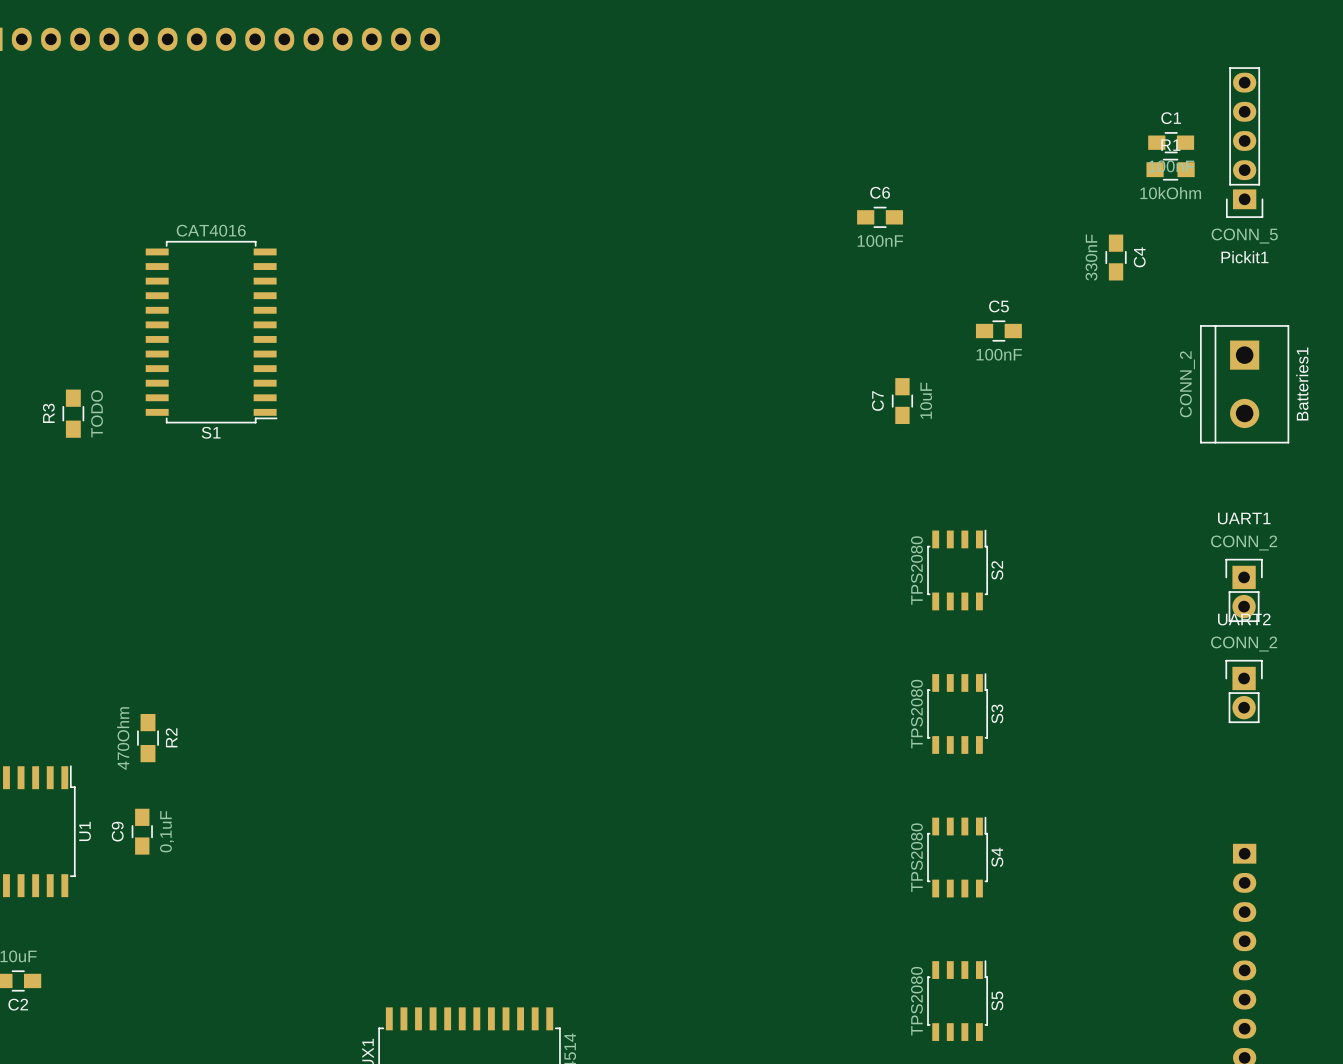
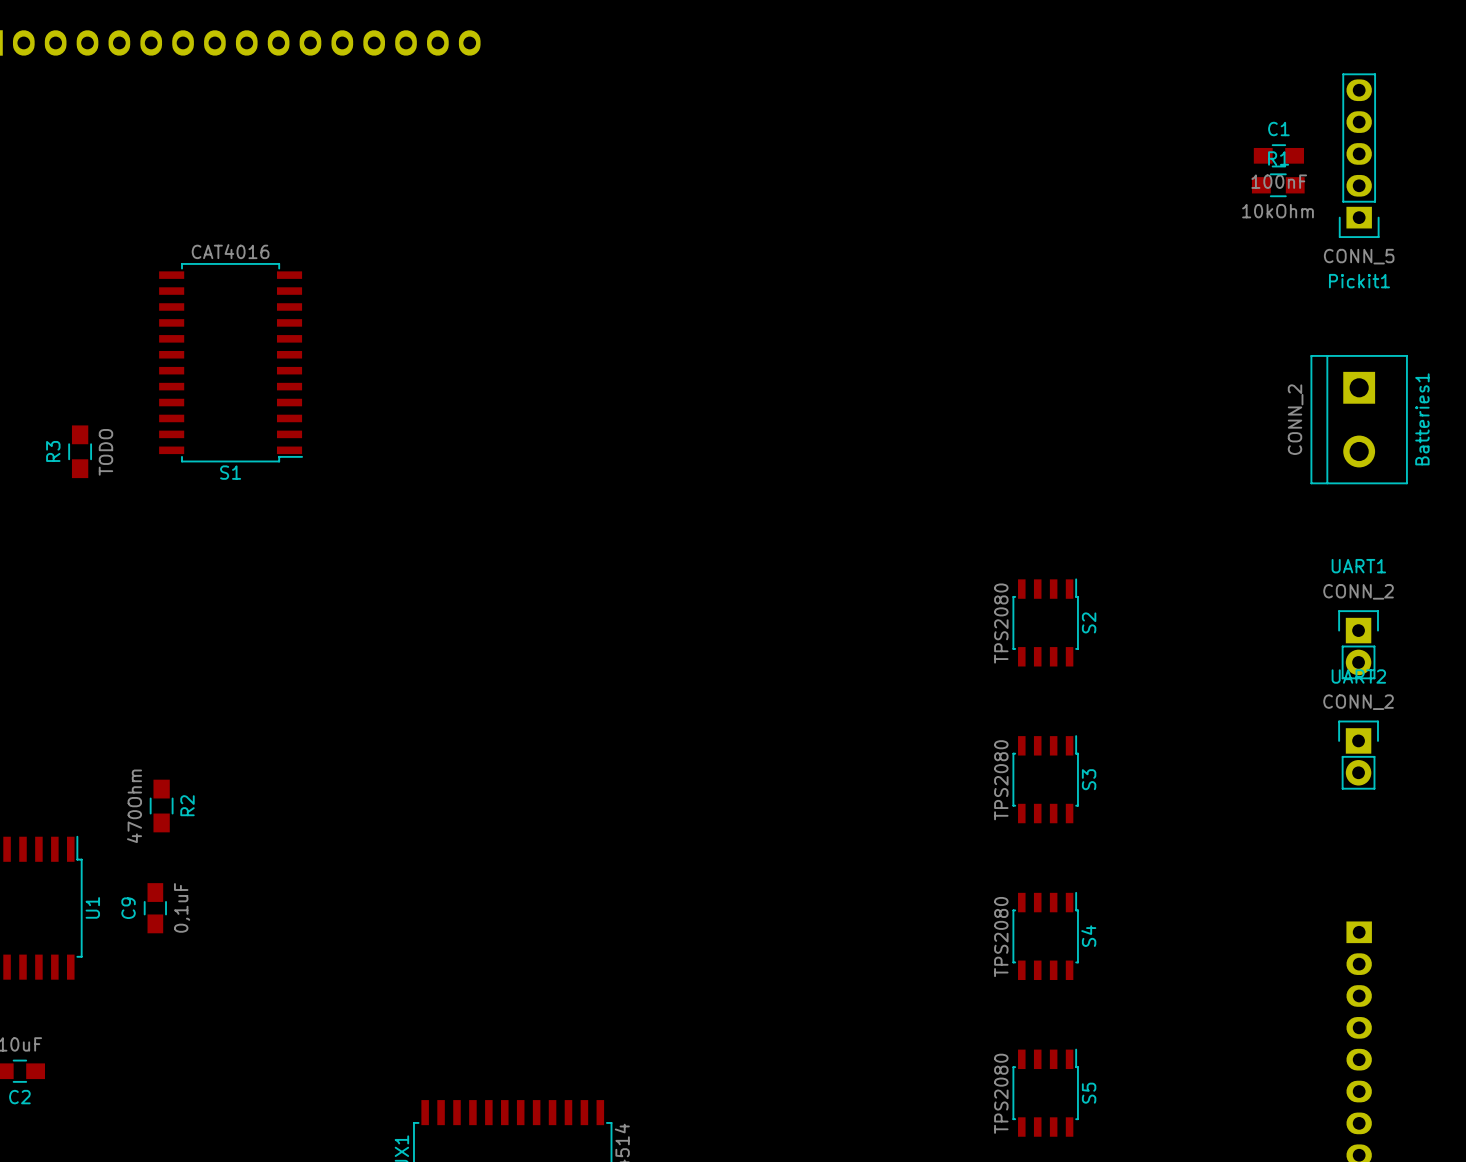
C6: 100nF (880, 217) -> none
C4: 330nF (1116, 257) -> none
C5: 100nF (998, 331) -> none
C7: 10uF (902, 401) -> none

